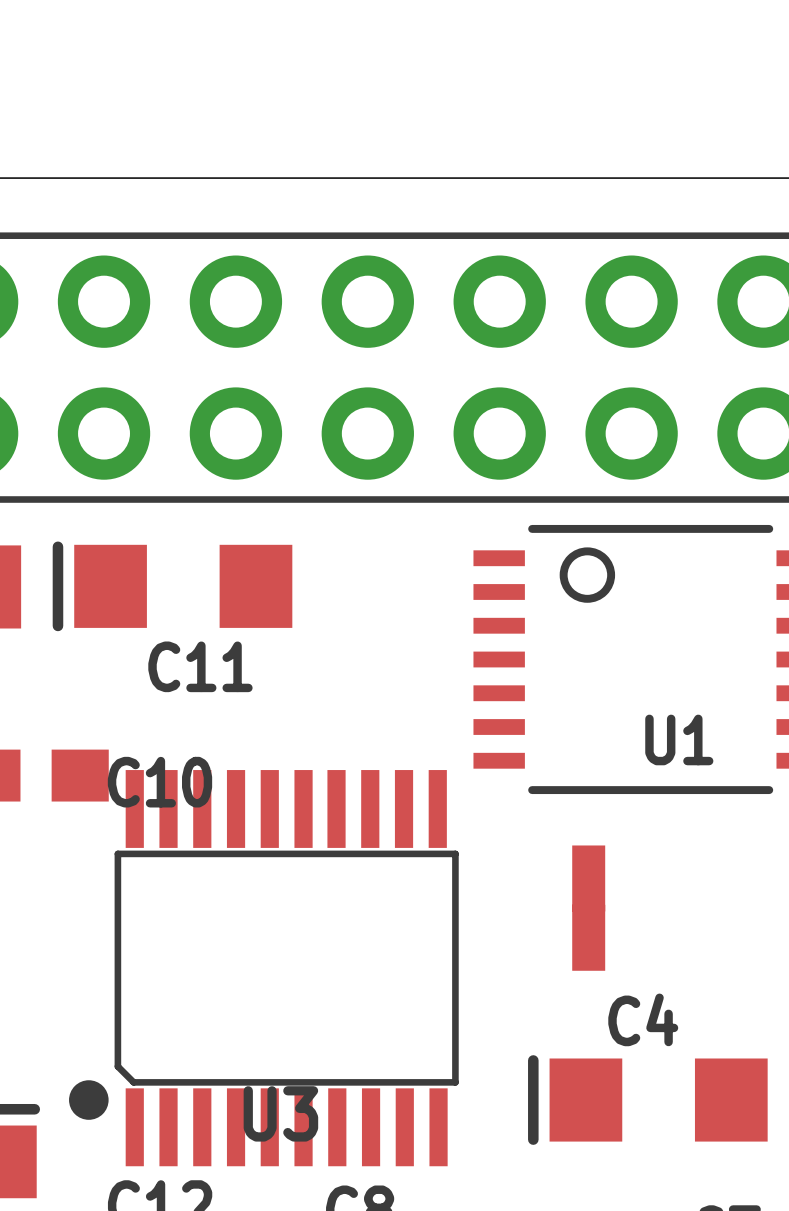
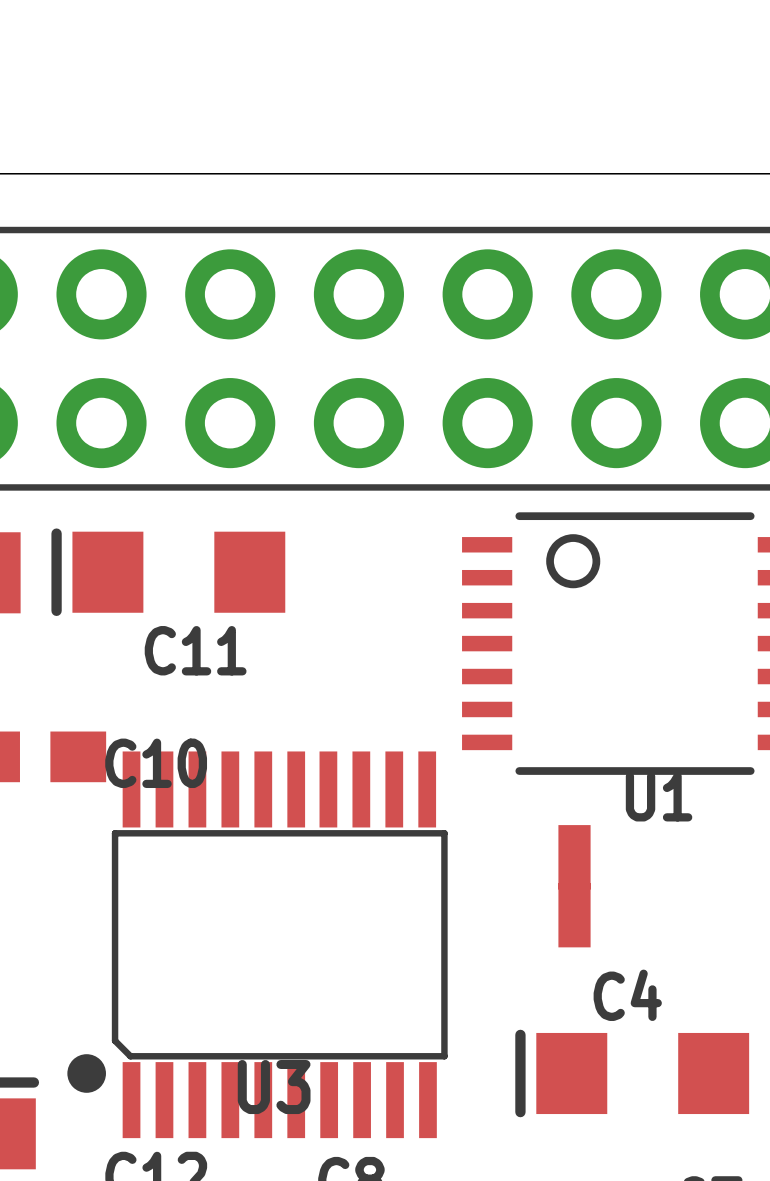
U1 name position: U1 (679, 739) -> U1 (659, 796)

